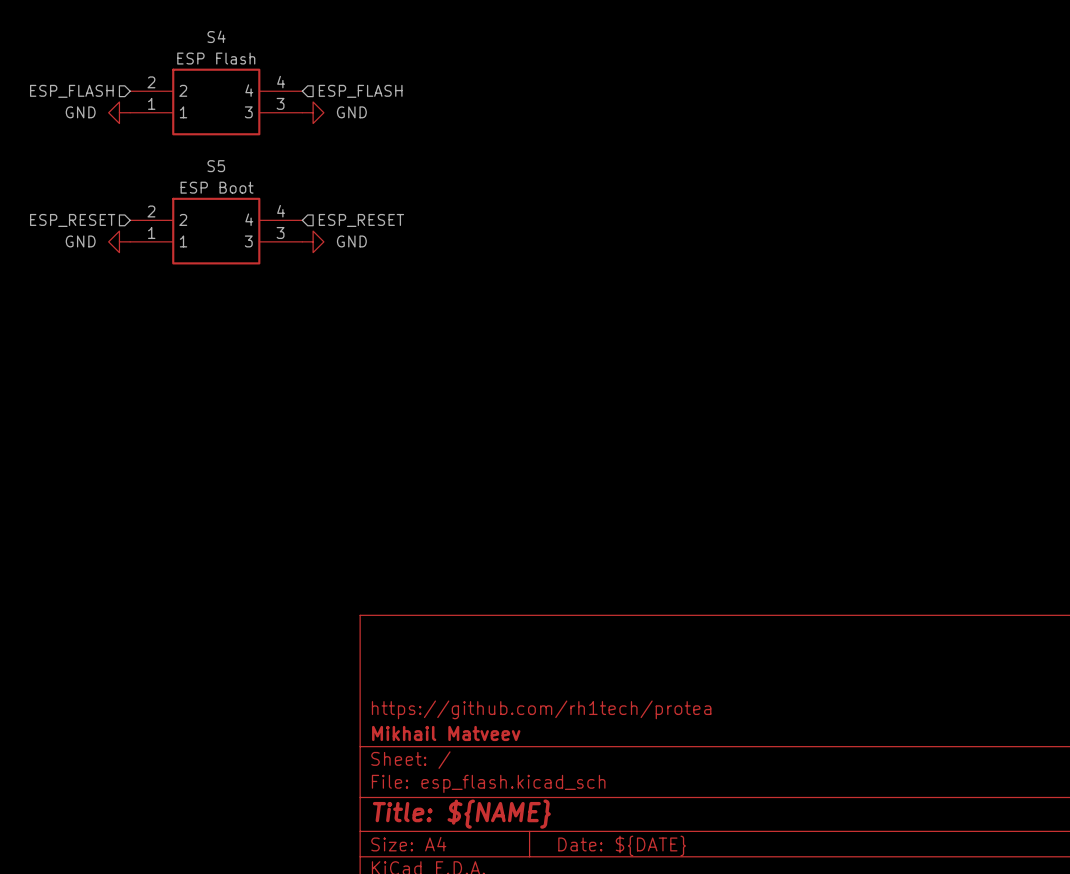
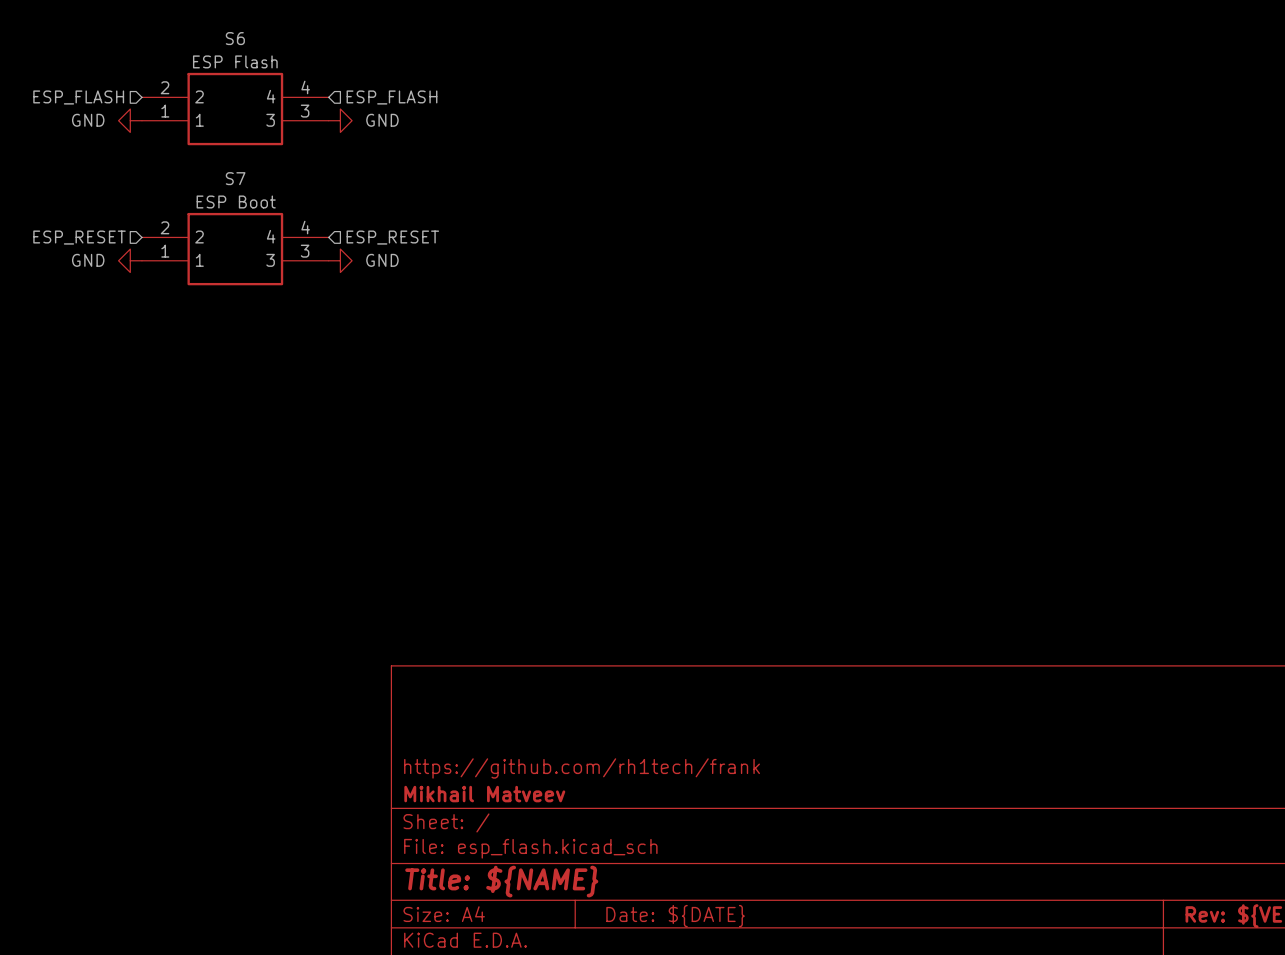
S4 name: S4 (216, 36) -> S6 (235, 38)
S5 name: S5 (216, 166) -> S7 (235, 178)
title block: https://github.com/rh1tech/protea (541, 709) -> https://github.com/rh1tech/frank (582, 768)

